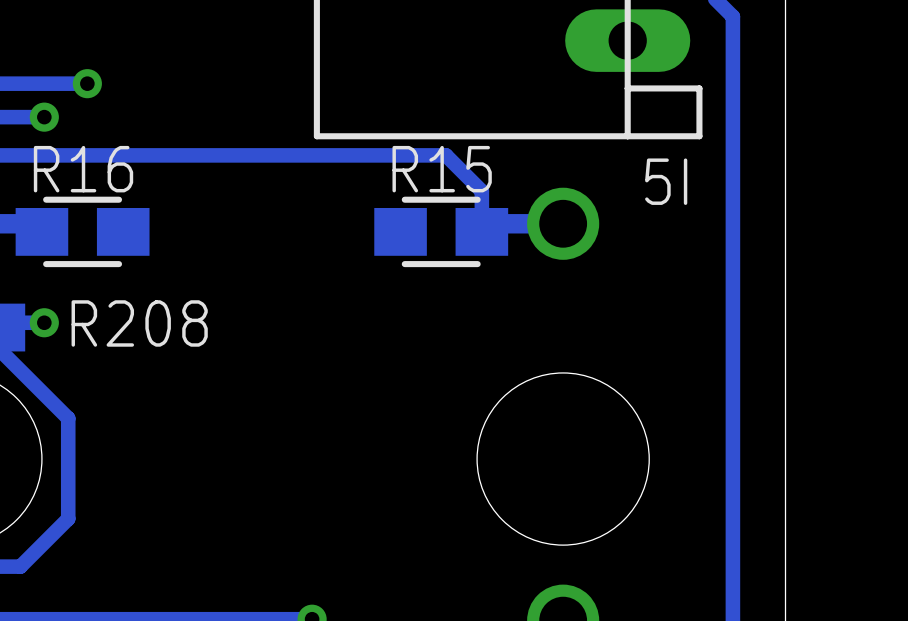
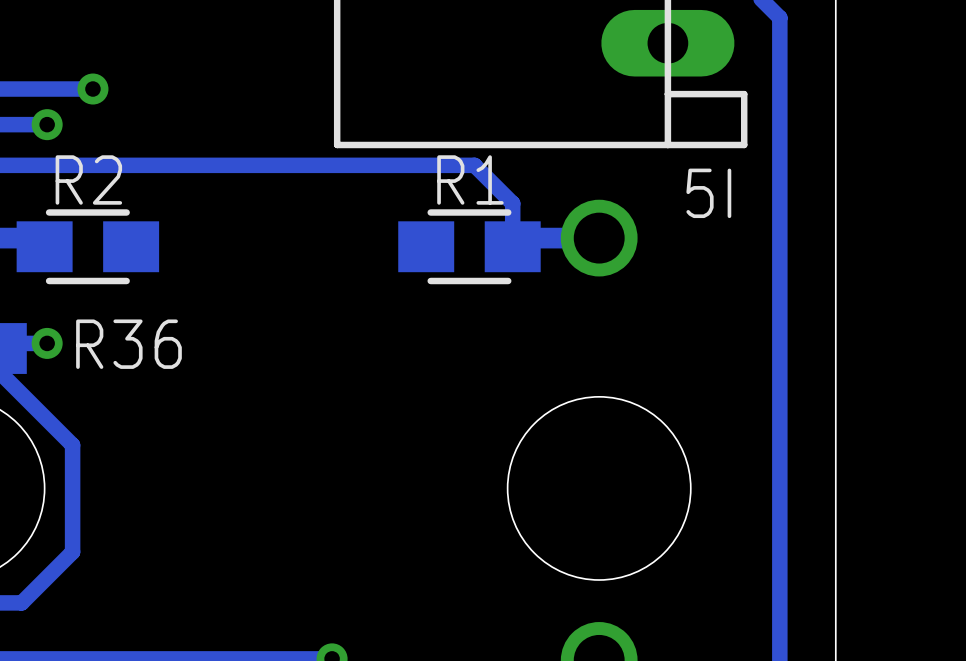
R16 name: R16 (83, 169) -> R2 (88, 179)
R15 name: R15 (442, 169) -> R1 (470, 179)
R208 name: R208 (139, 323) -> R36 (128, 344)

